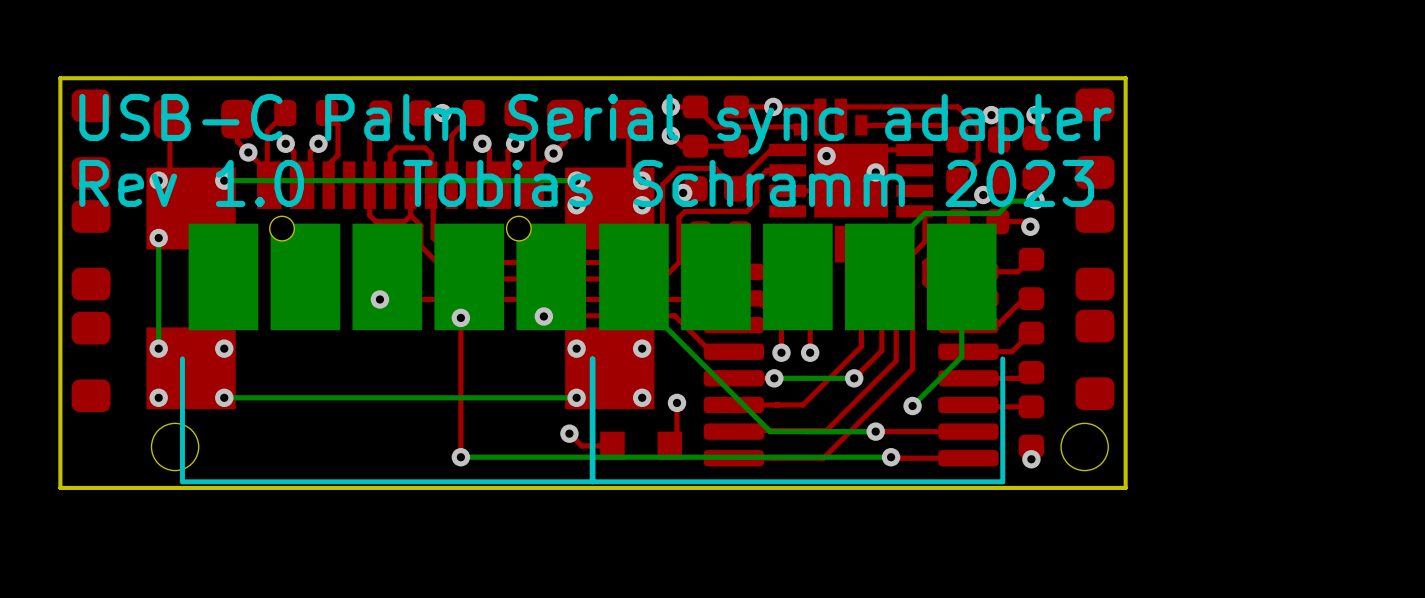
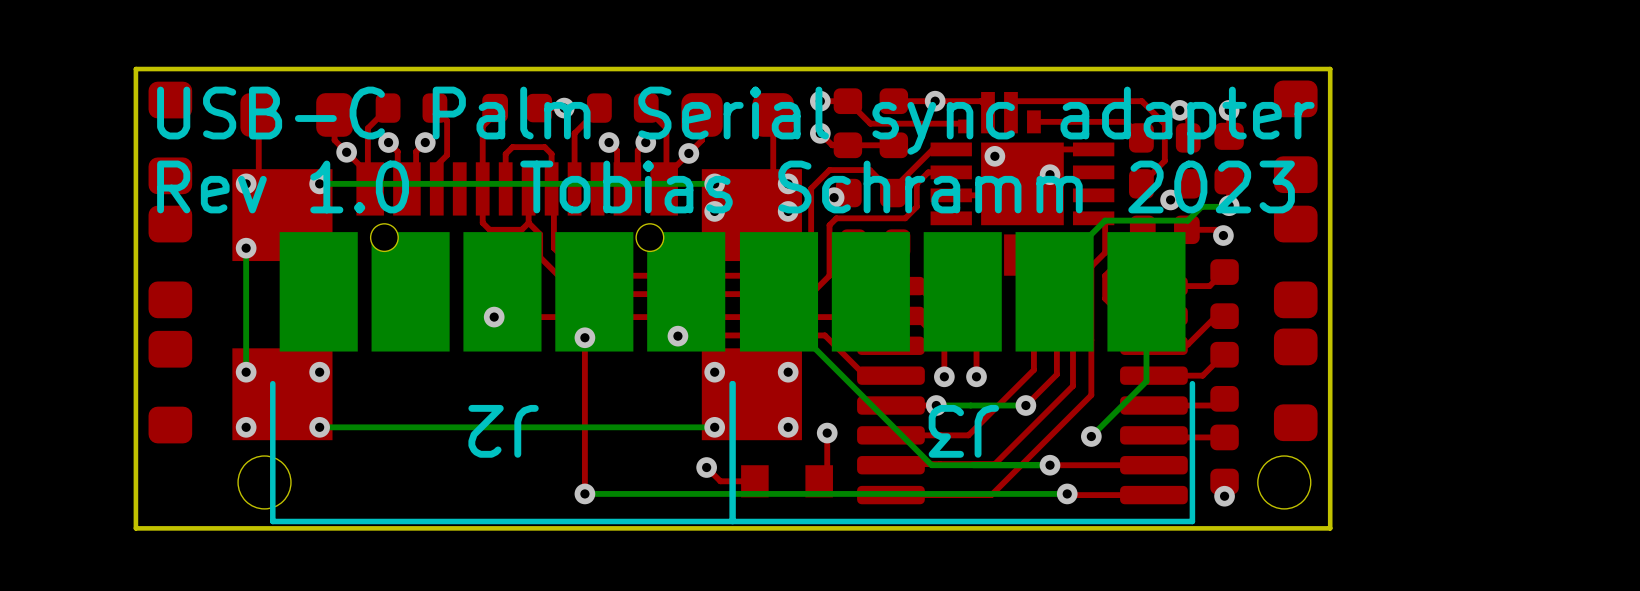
J2 name: none -> J2 (503, 431)
J3 name: none -> J3 (963, 431)

